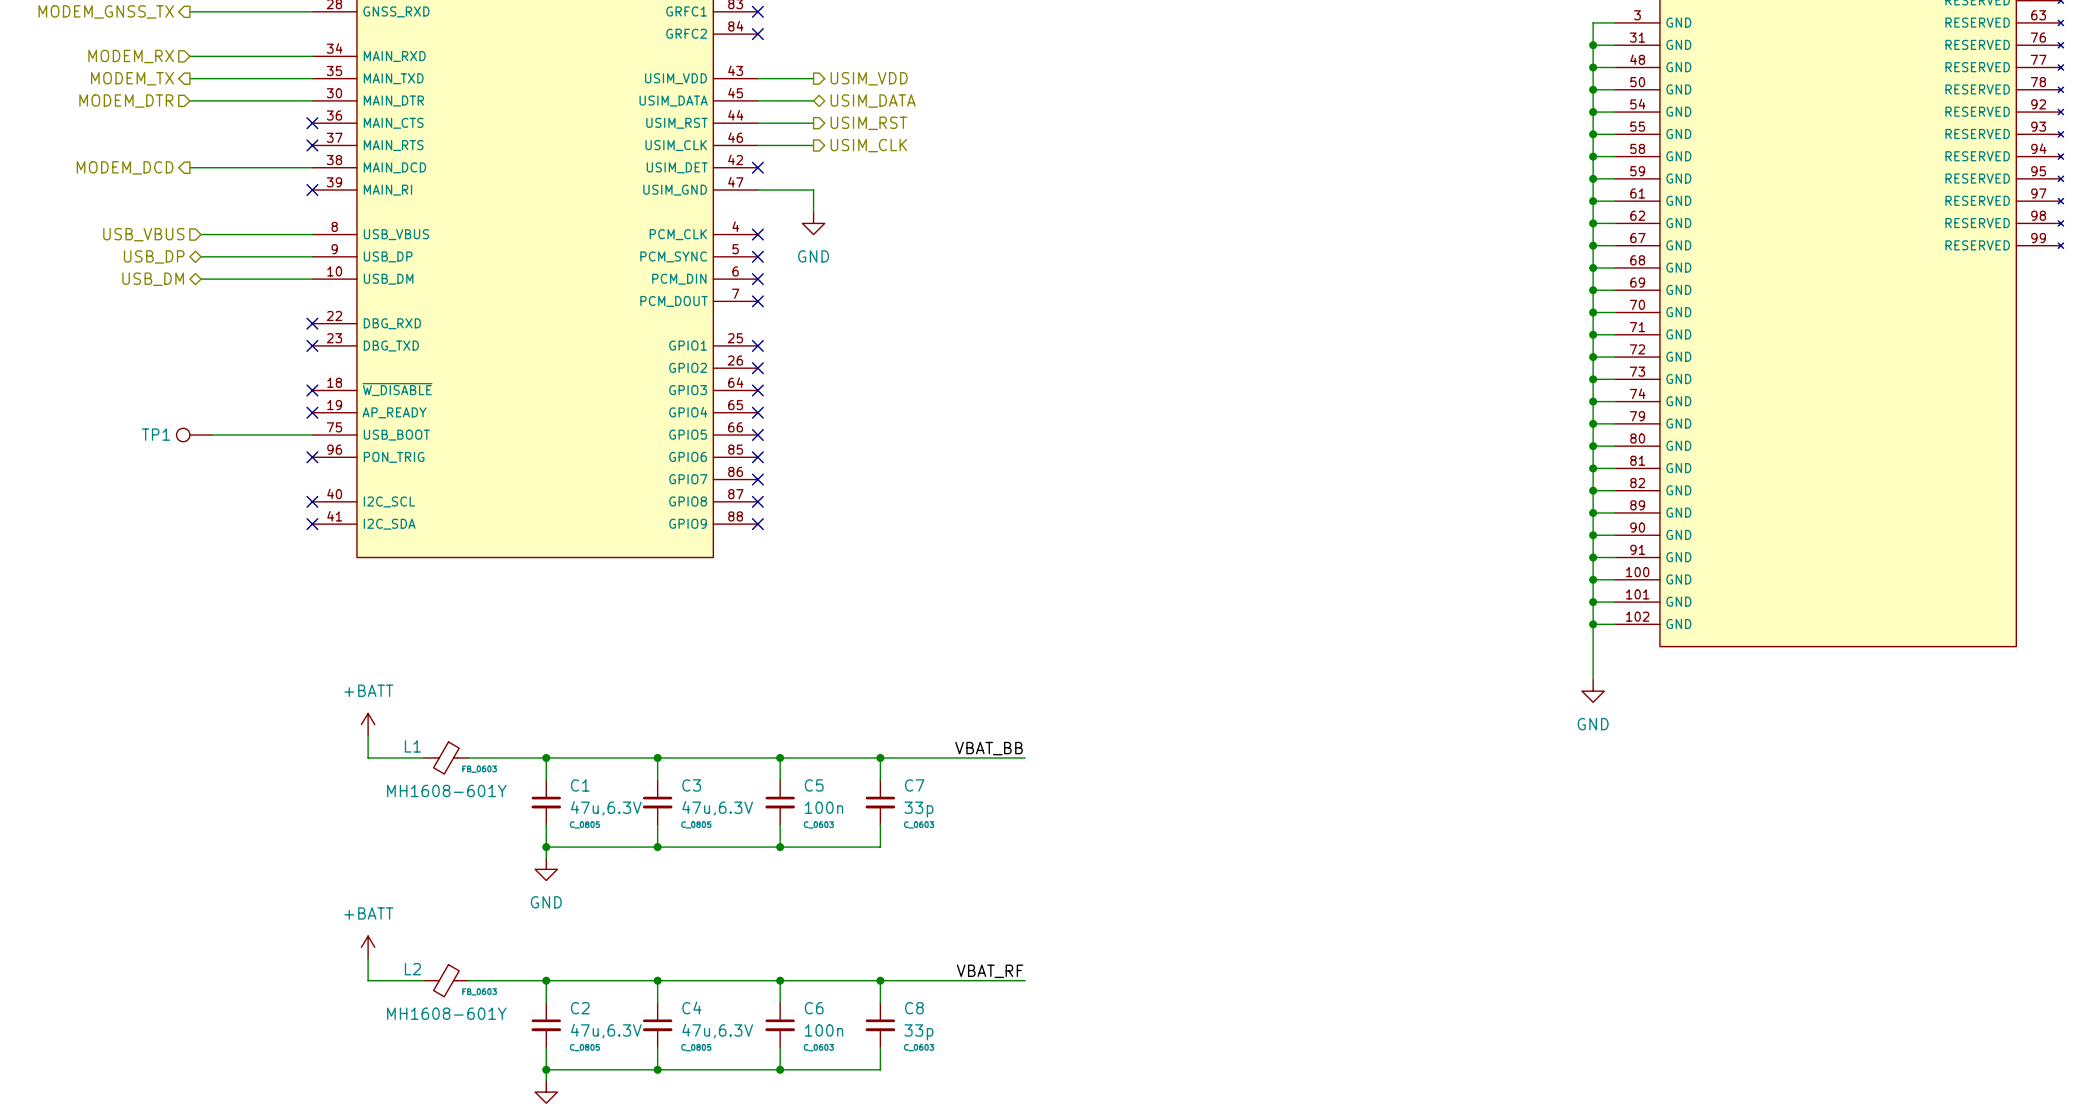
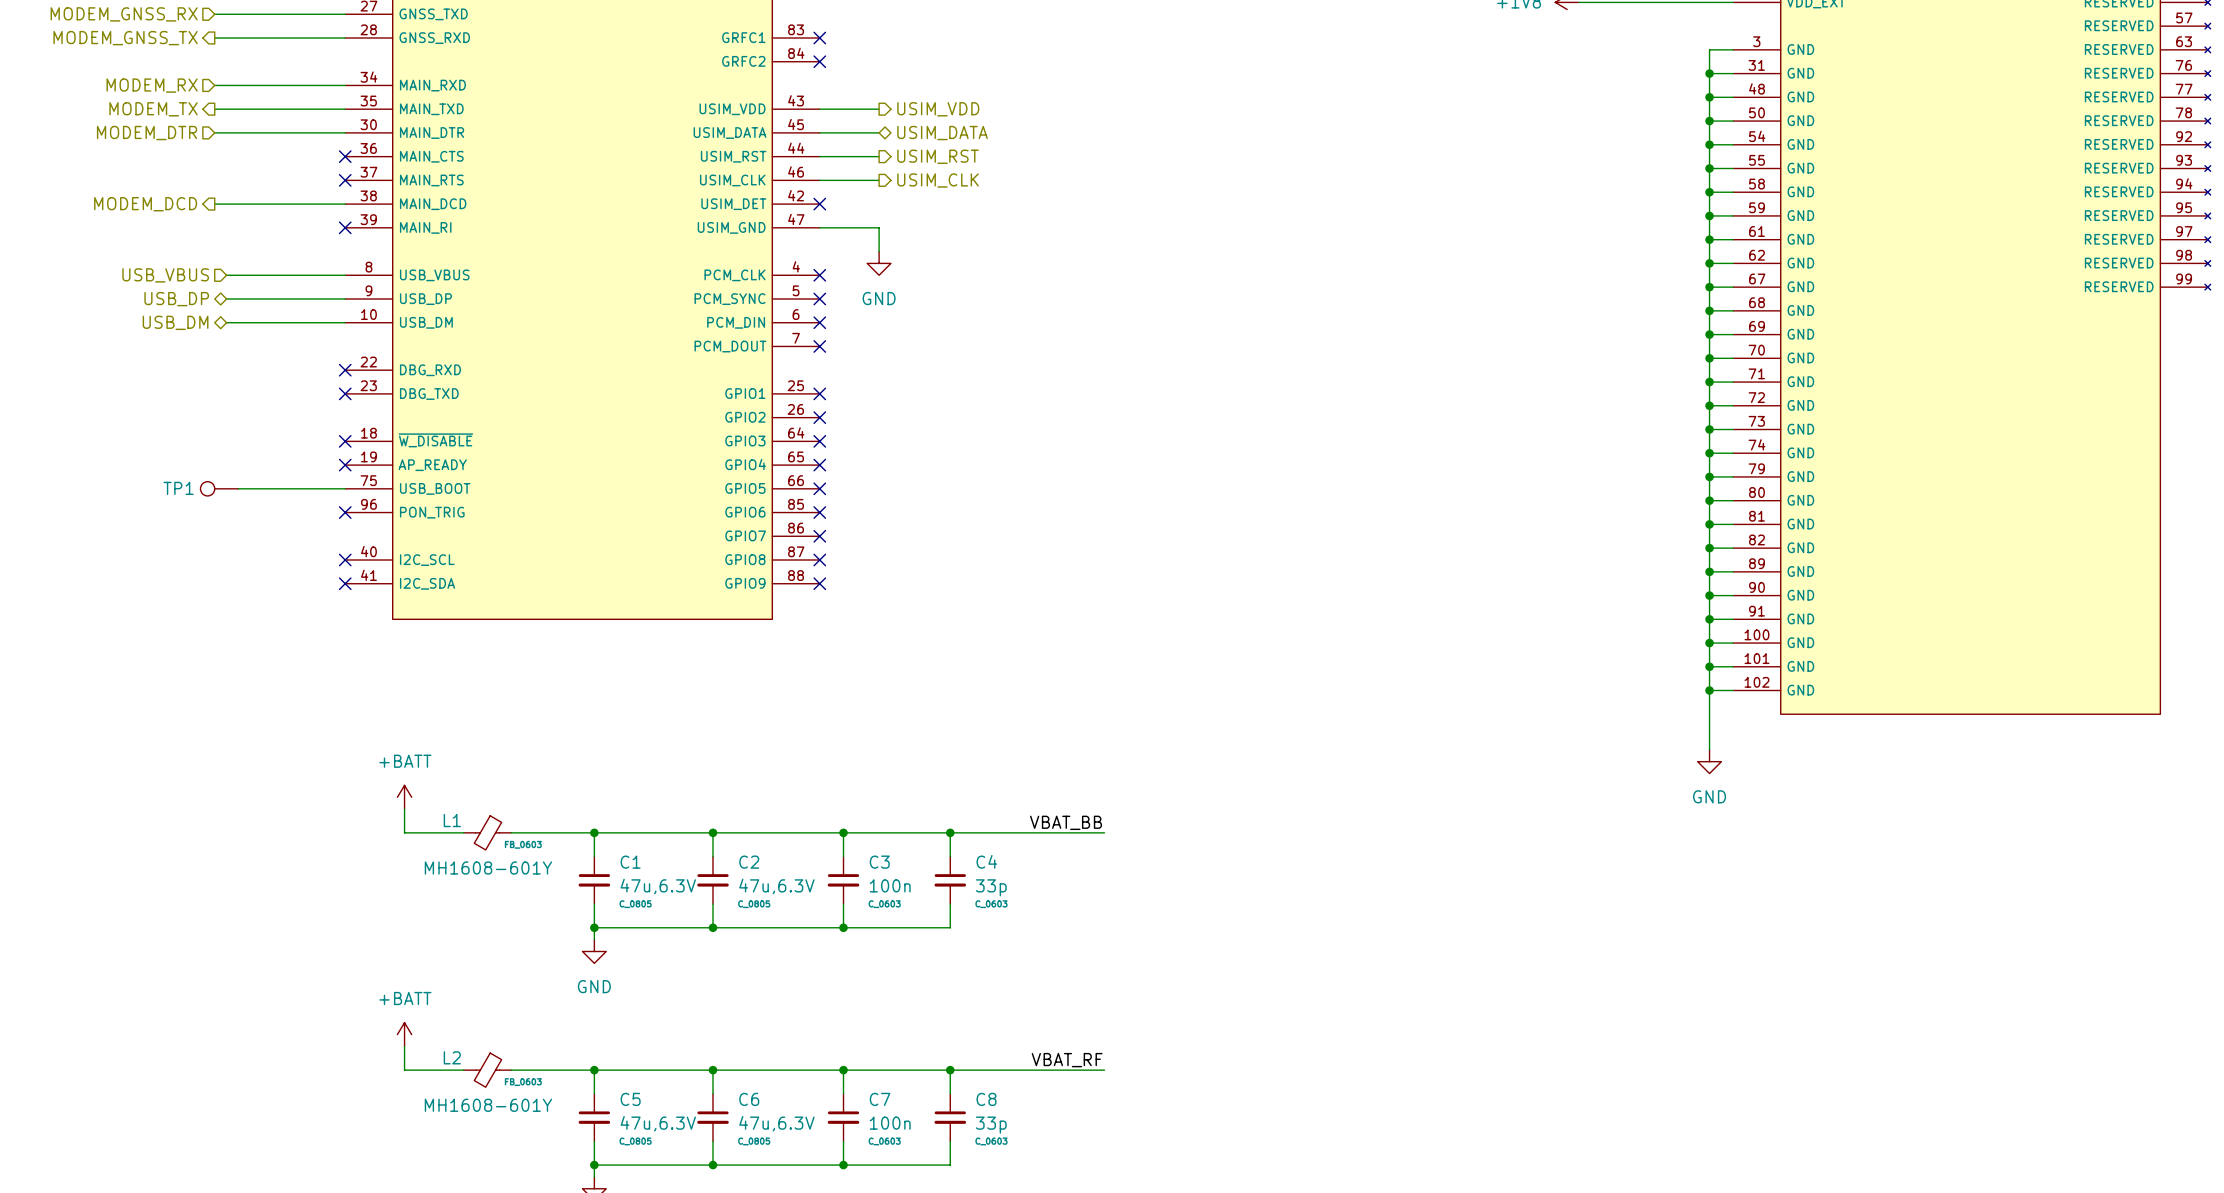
C3 name: C3 (691, 785) -> C2 (749, 862)
C5 name: C5 (814, 785) -> C3 (879, 862)
C7 name: C7 (914, 785) -> C4 (986, 861)
C4 name: C4 (691, 1007) -> C6 (749, 1099)
C2 name: C2 (580, 1008) -> C5 (630, 1099)
C6 name: C6 (814, 1008) -> C7 (880, 1099)

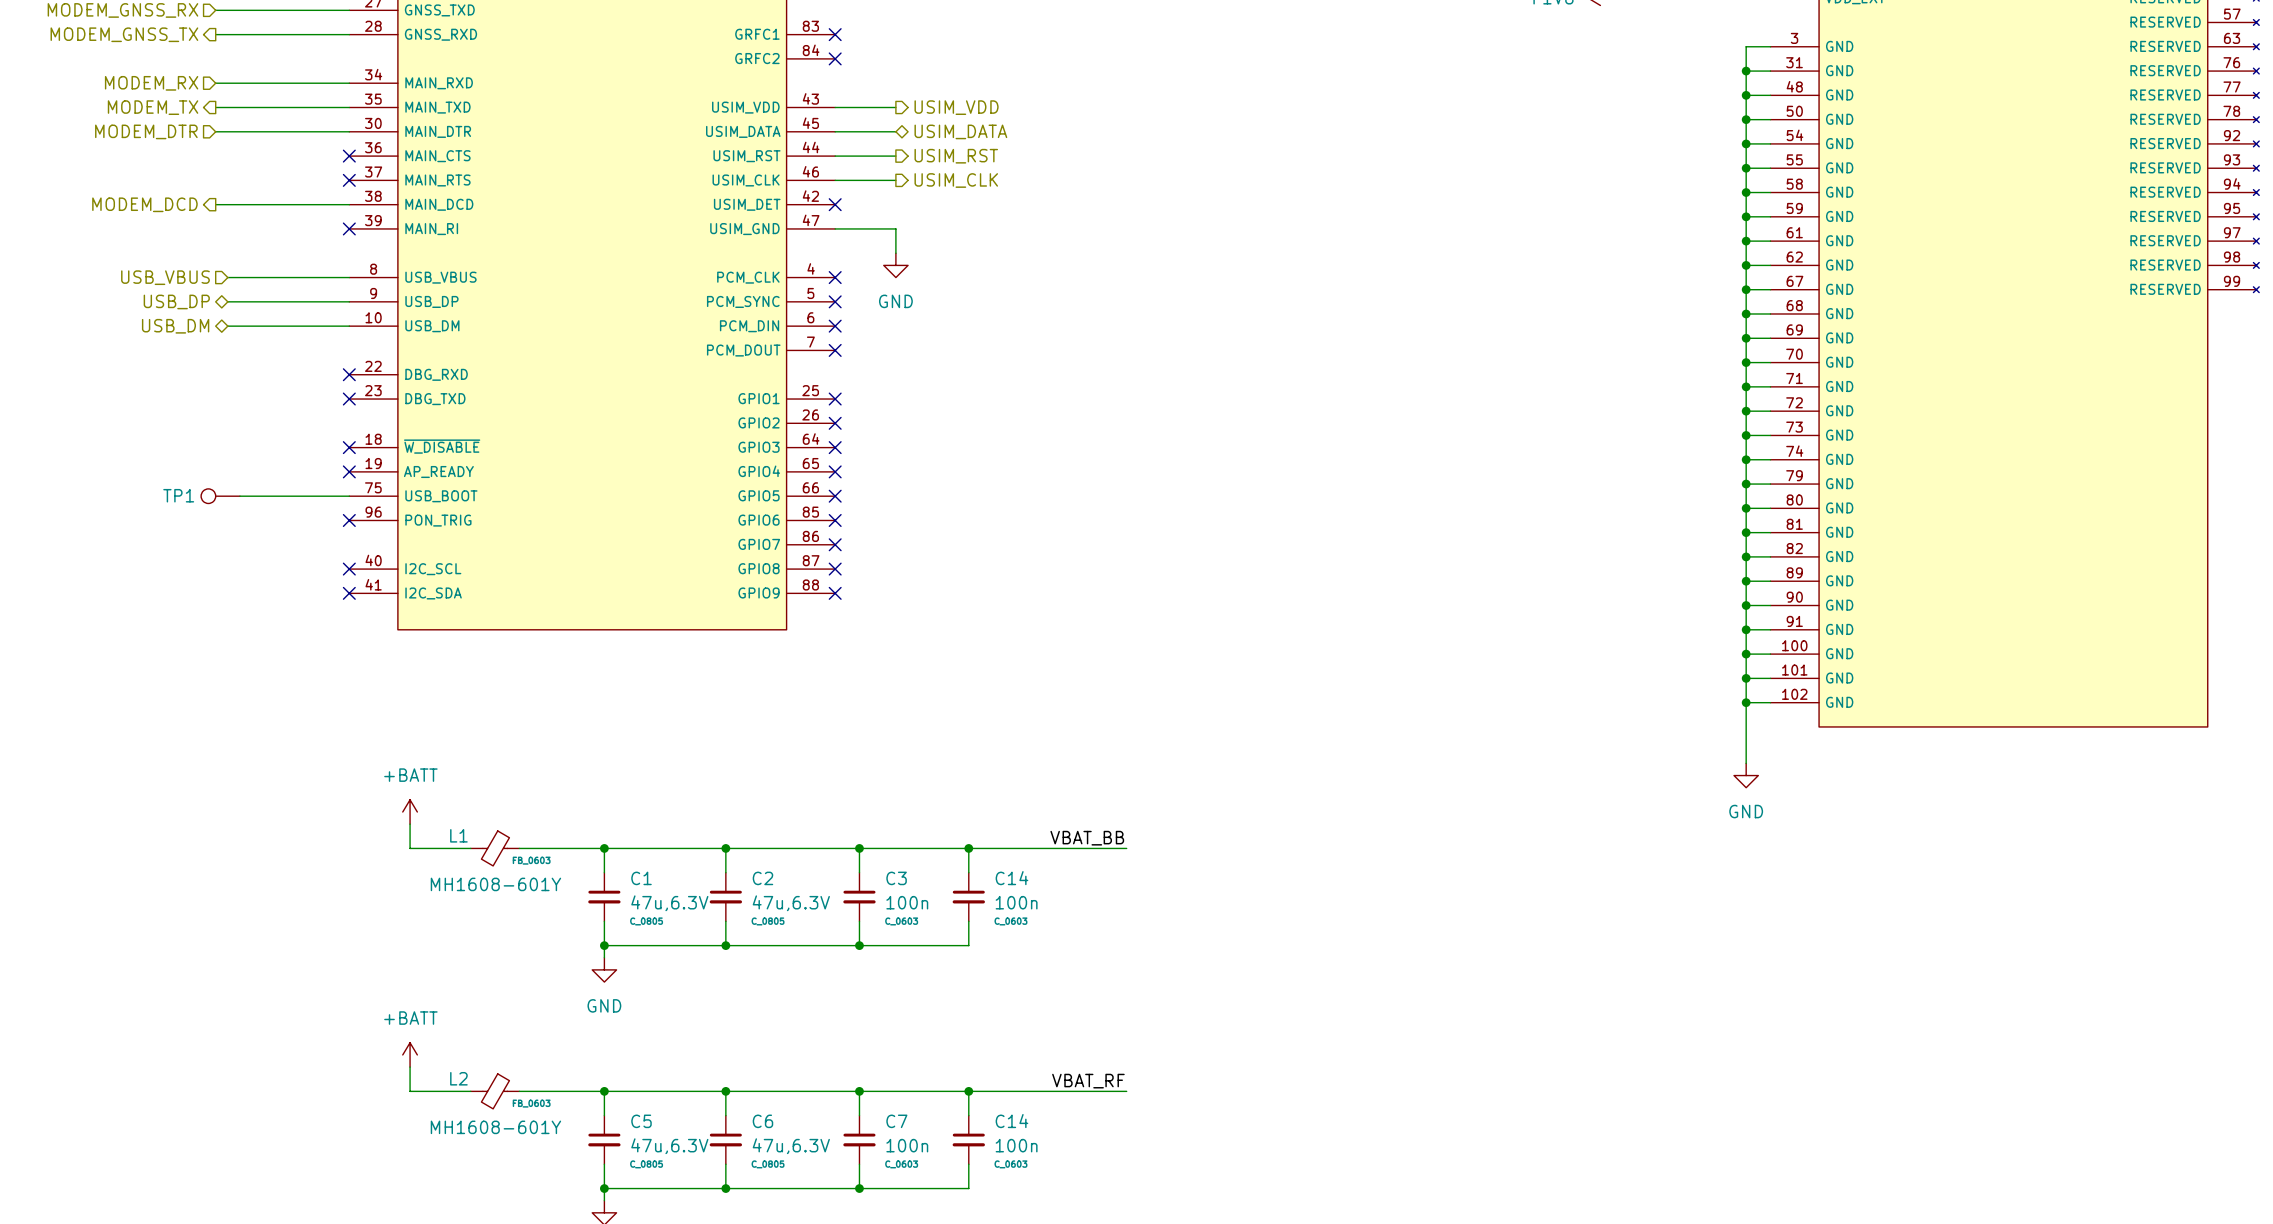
C4 name: C4 (986, 861) -> C14 (1011, 878)
C4 value: 33p (991, 887) -> 100n (1016, 902)
C8 name: C8 (986, 1099) -> C14 (1011, 1121)
C8 value: 33p (991, 1125) -> 100n (1016, 1145)

